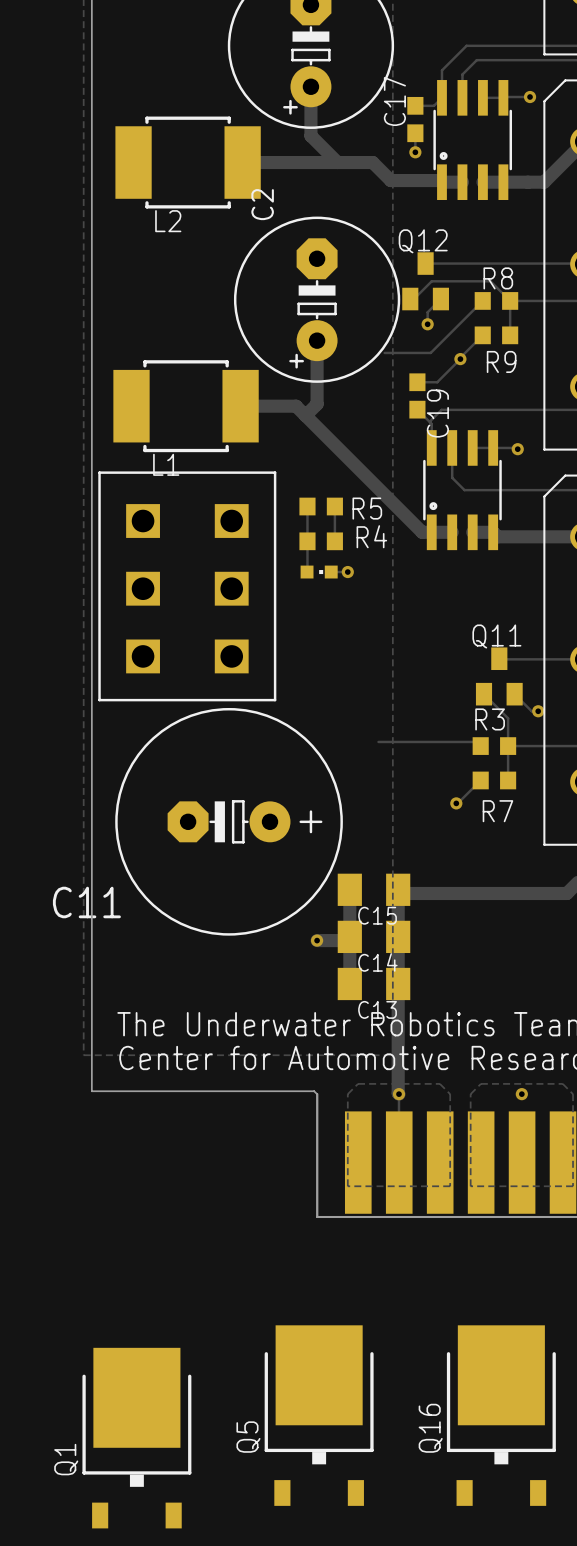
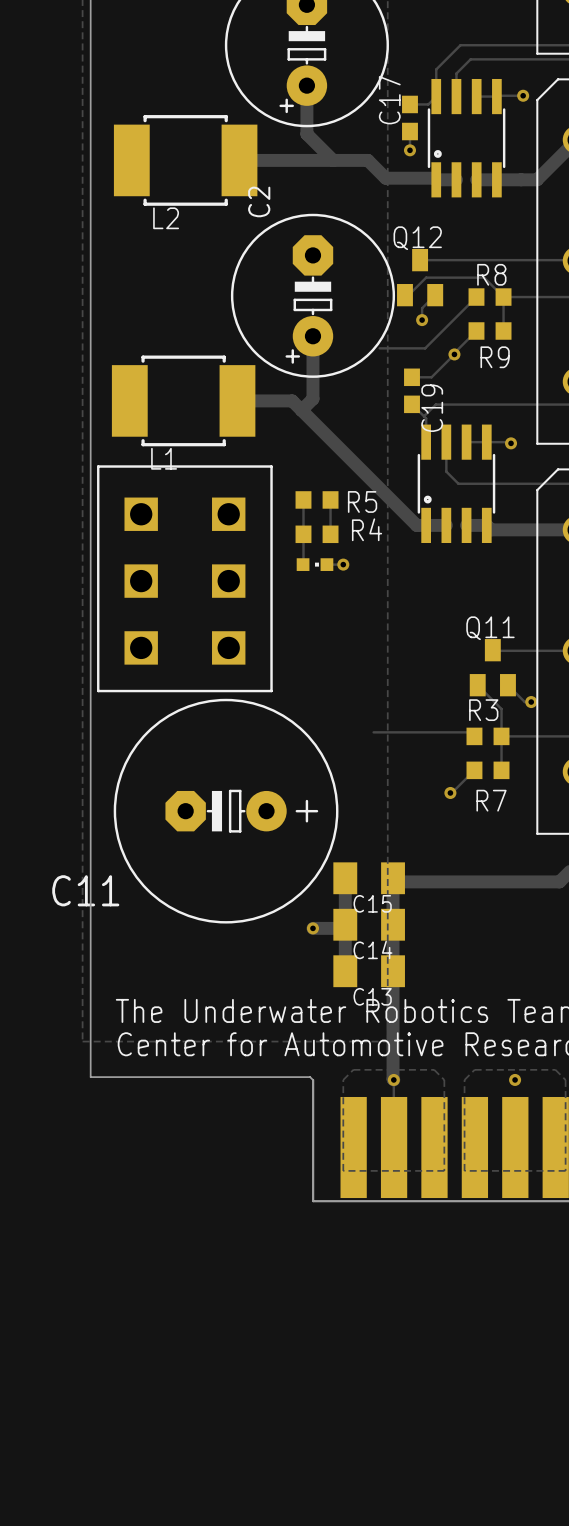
Q5: (319, 1415) -> none
Q16: (501, 1415) -> none
Q1: (136, 1438) -> none

